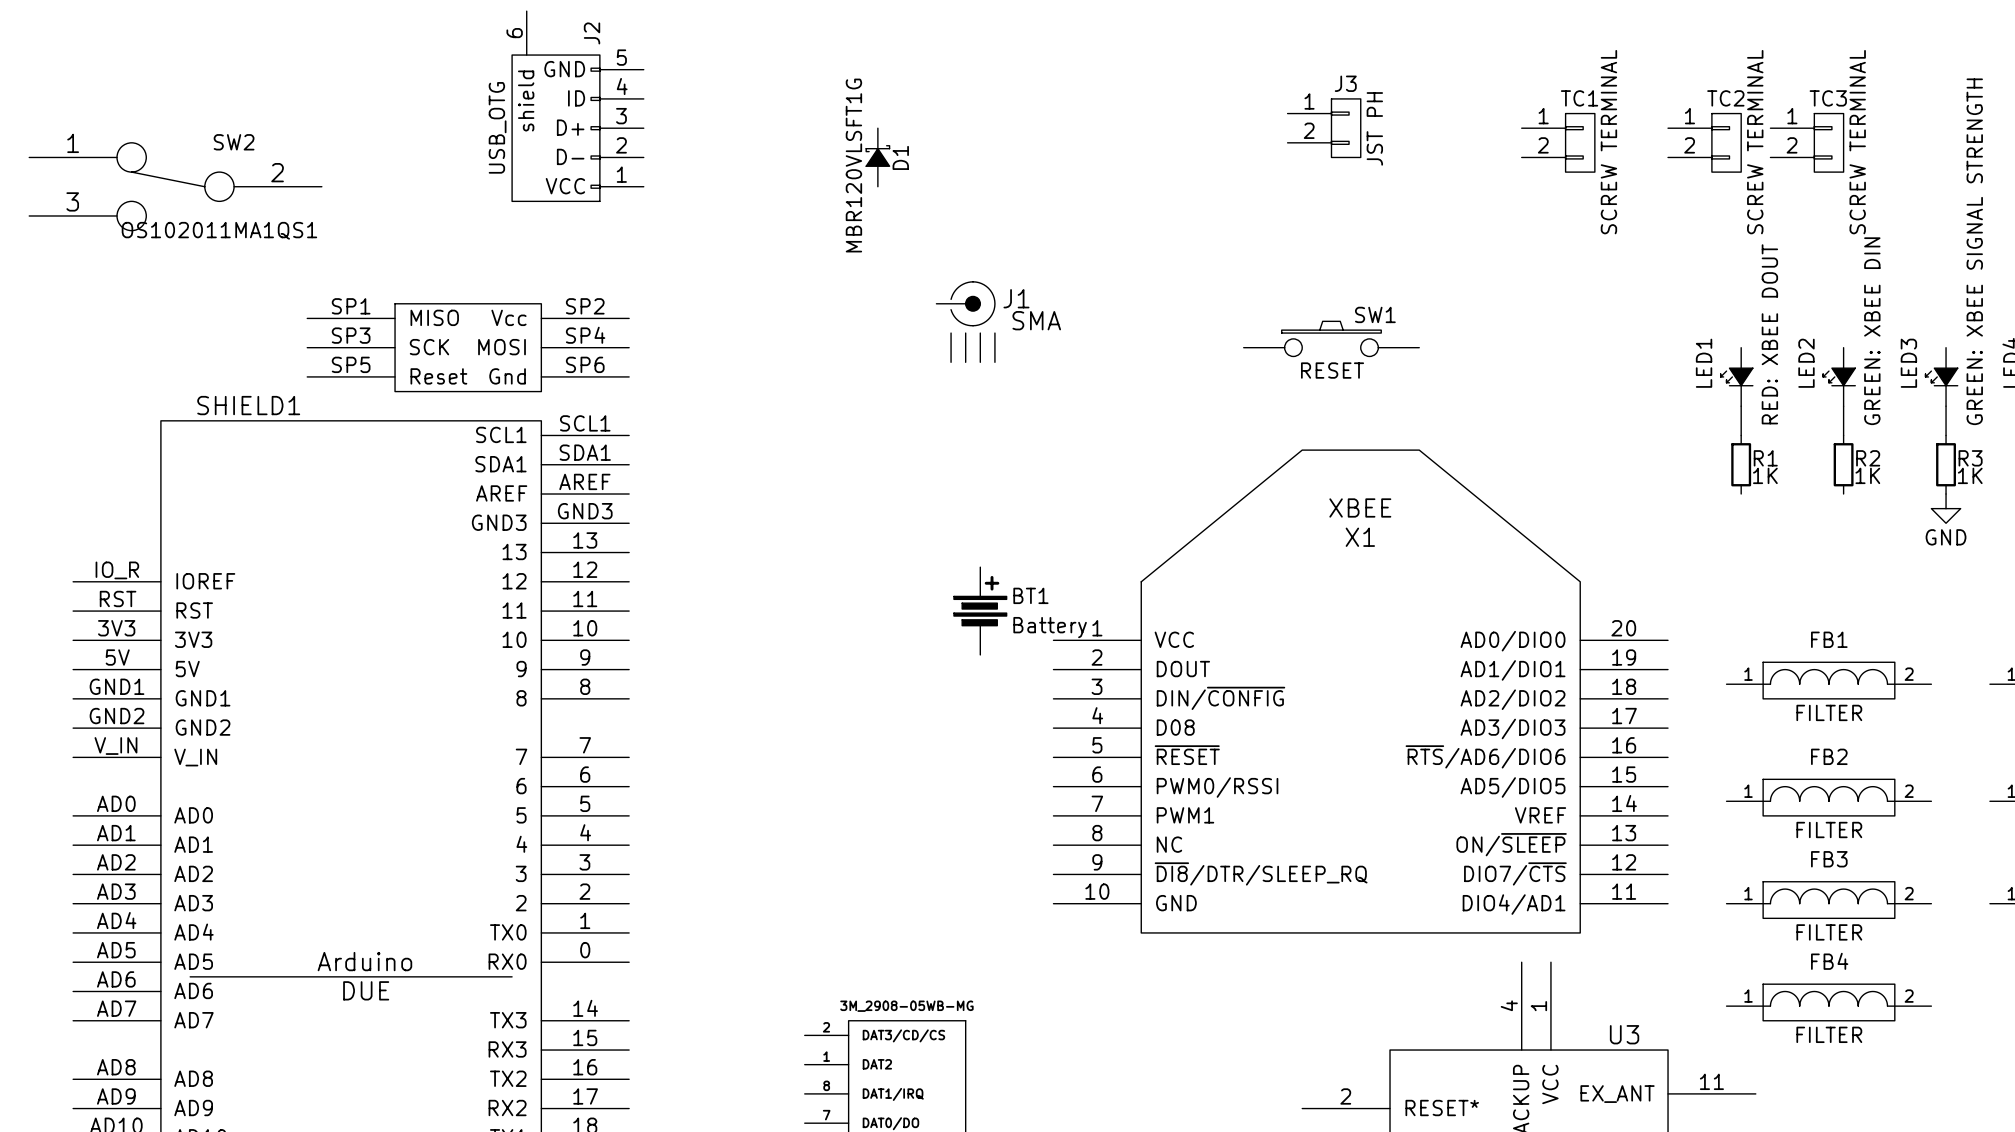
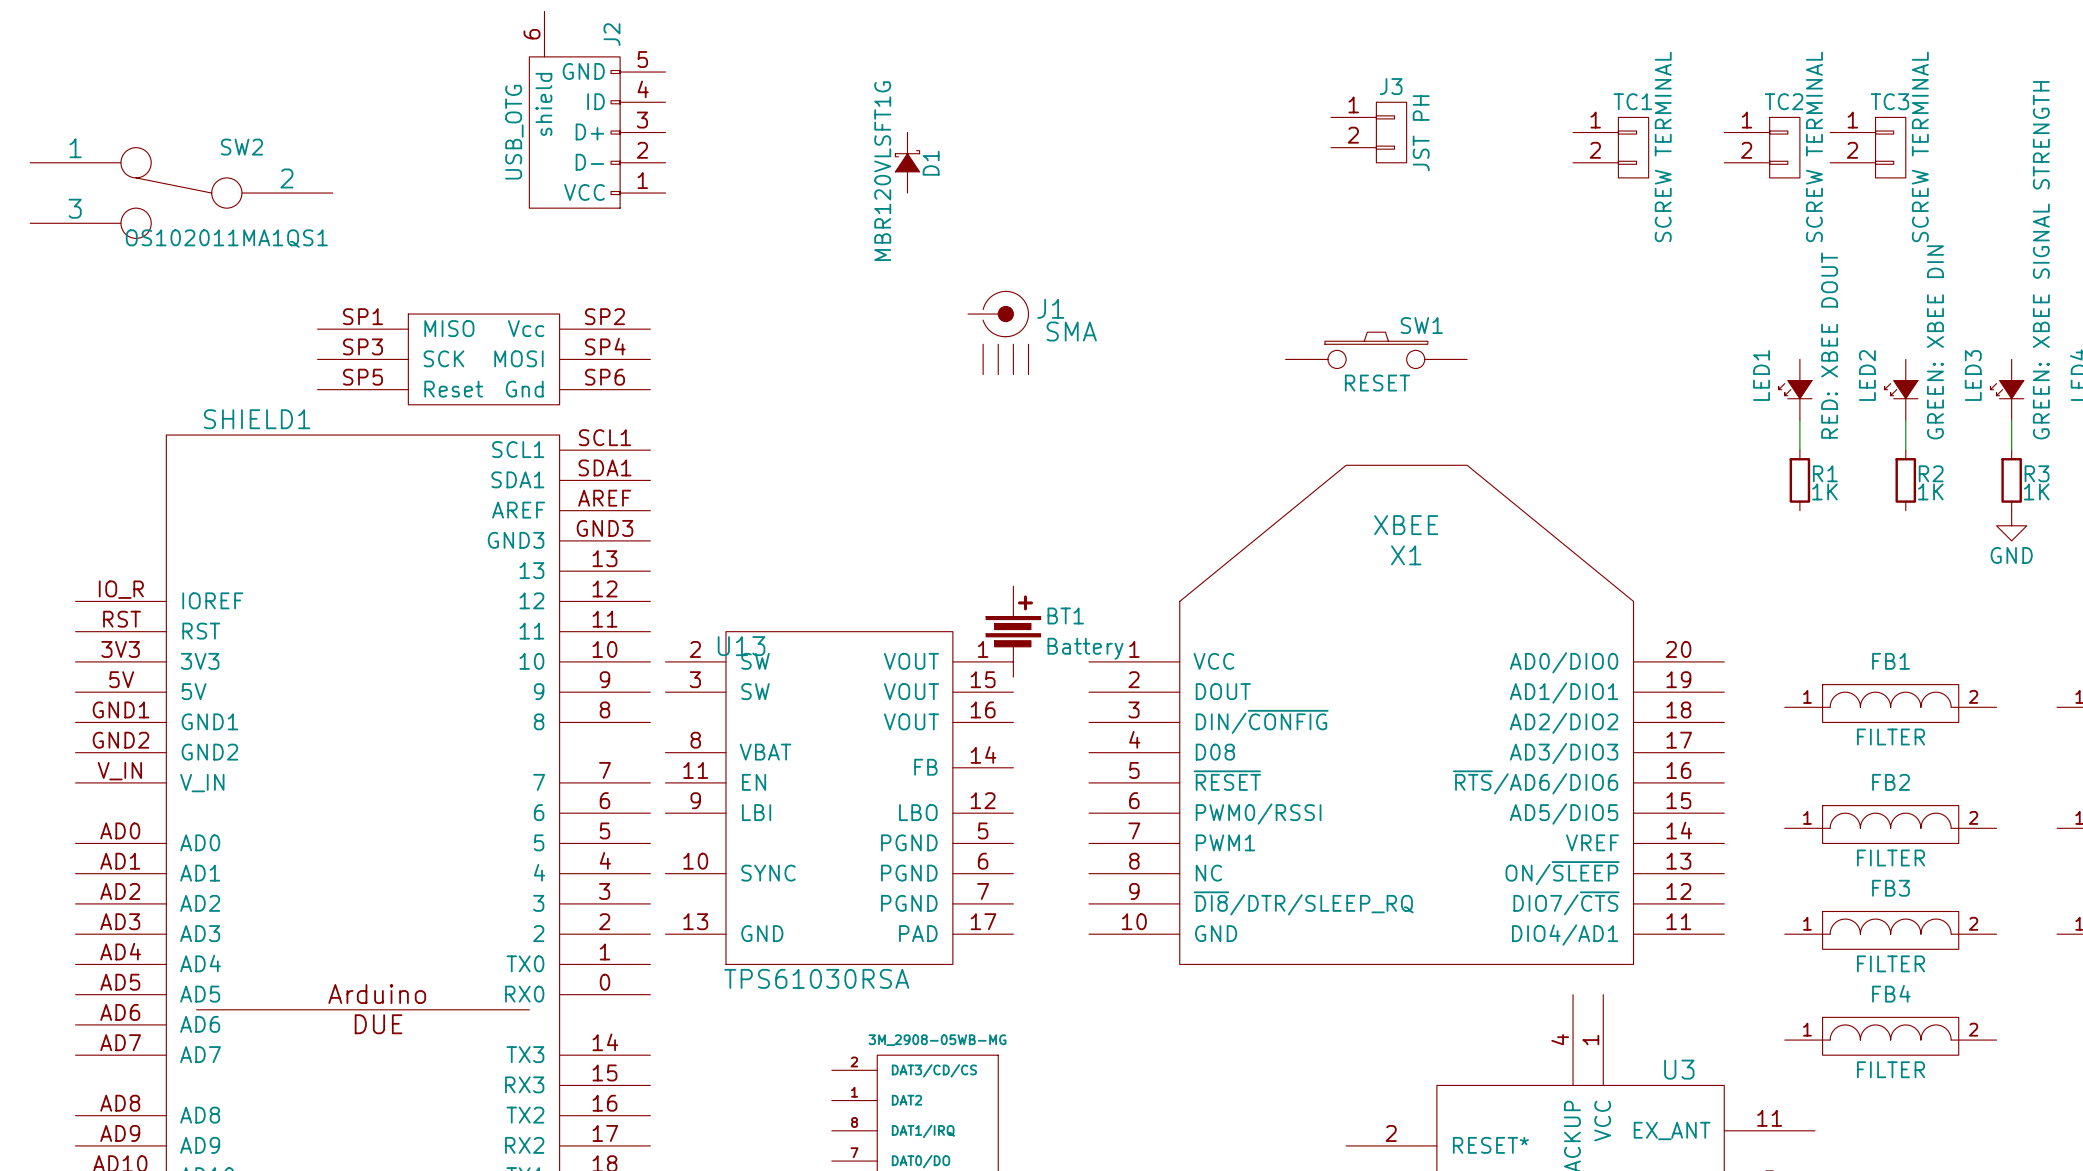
U13: none -> TPS61030RSA (839, 798)

